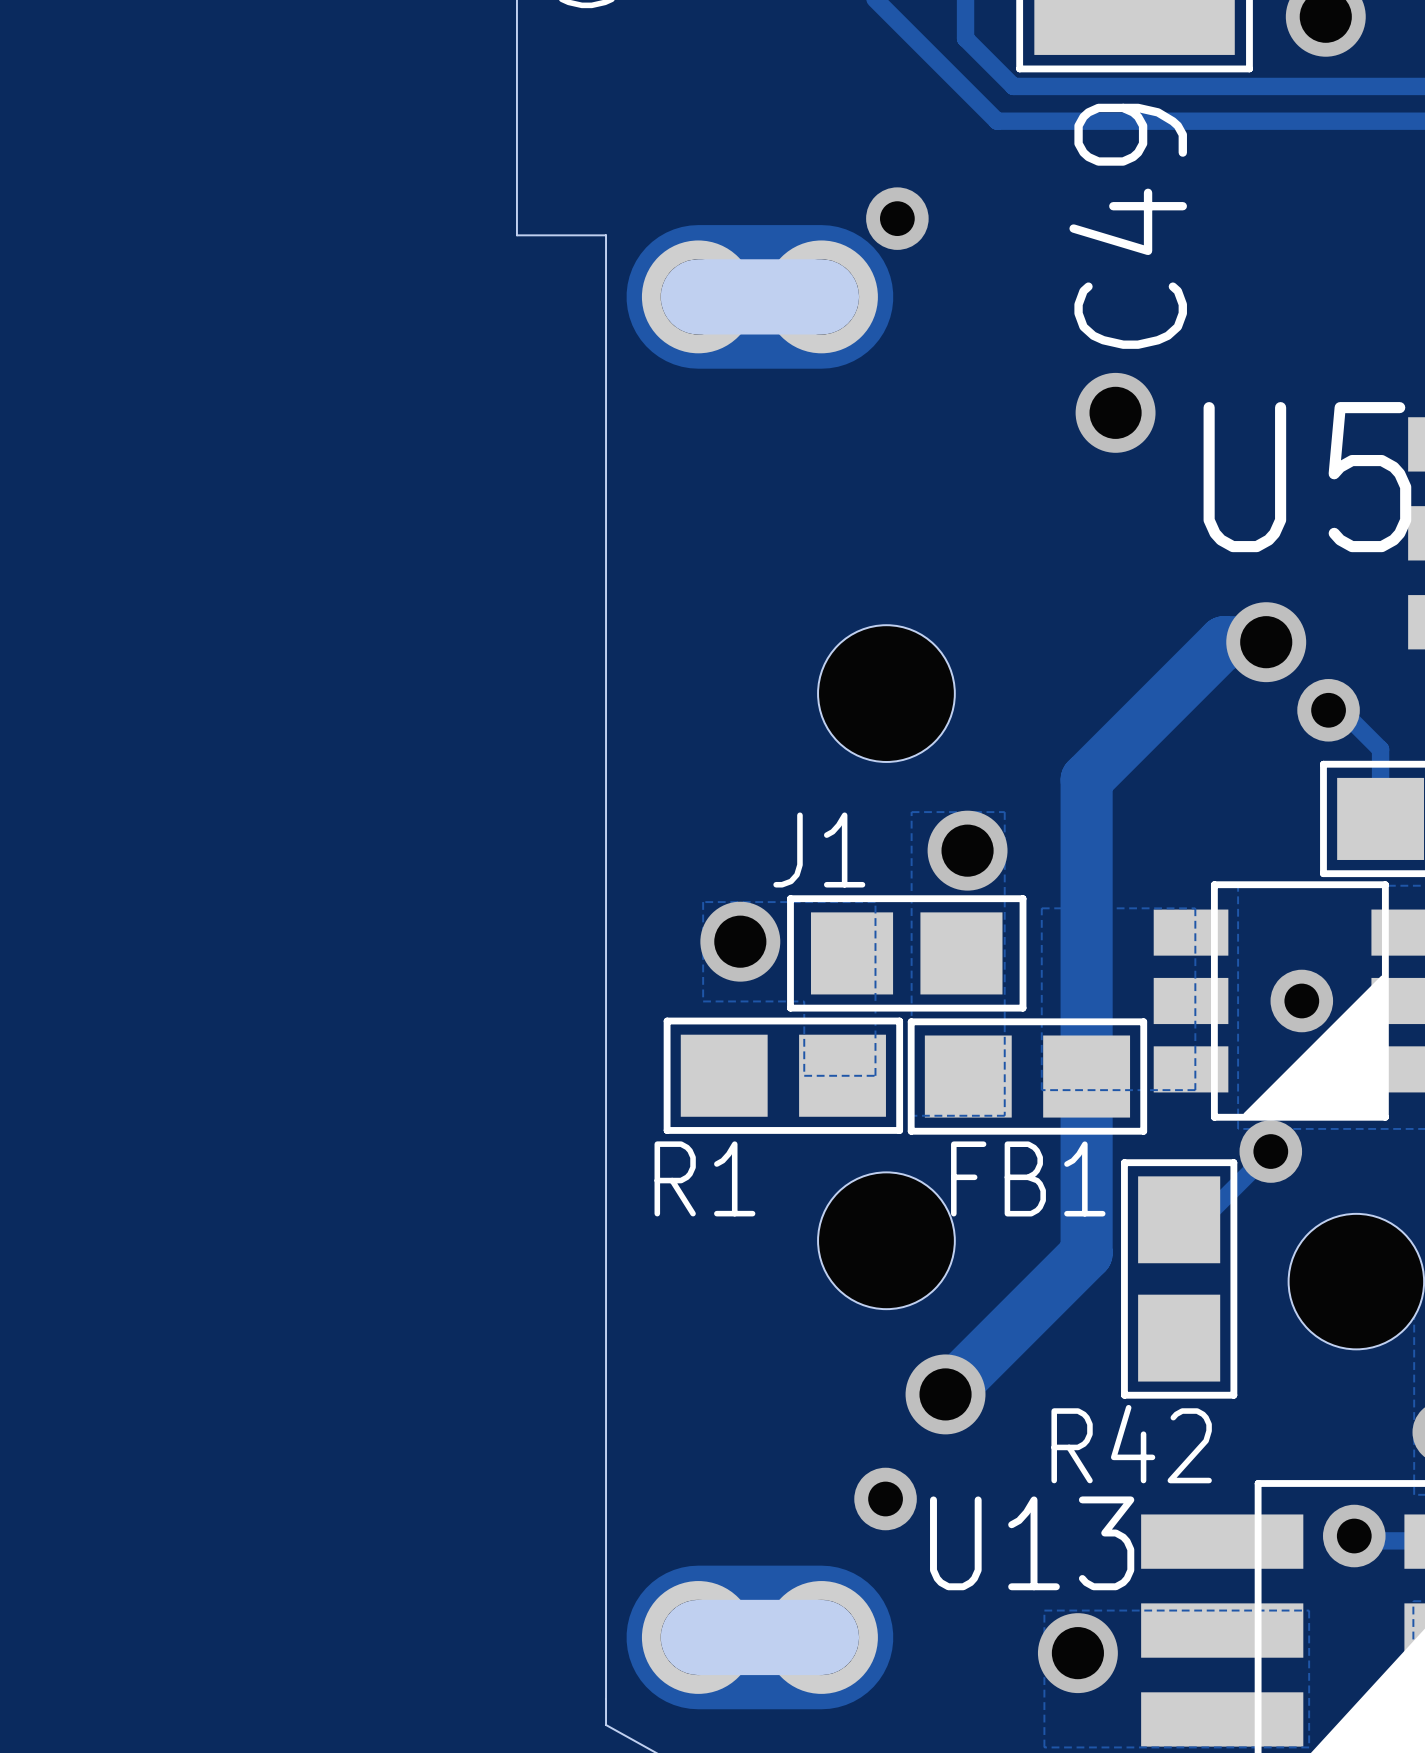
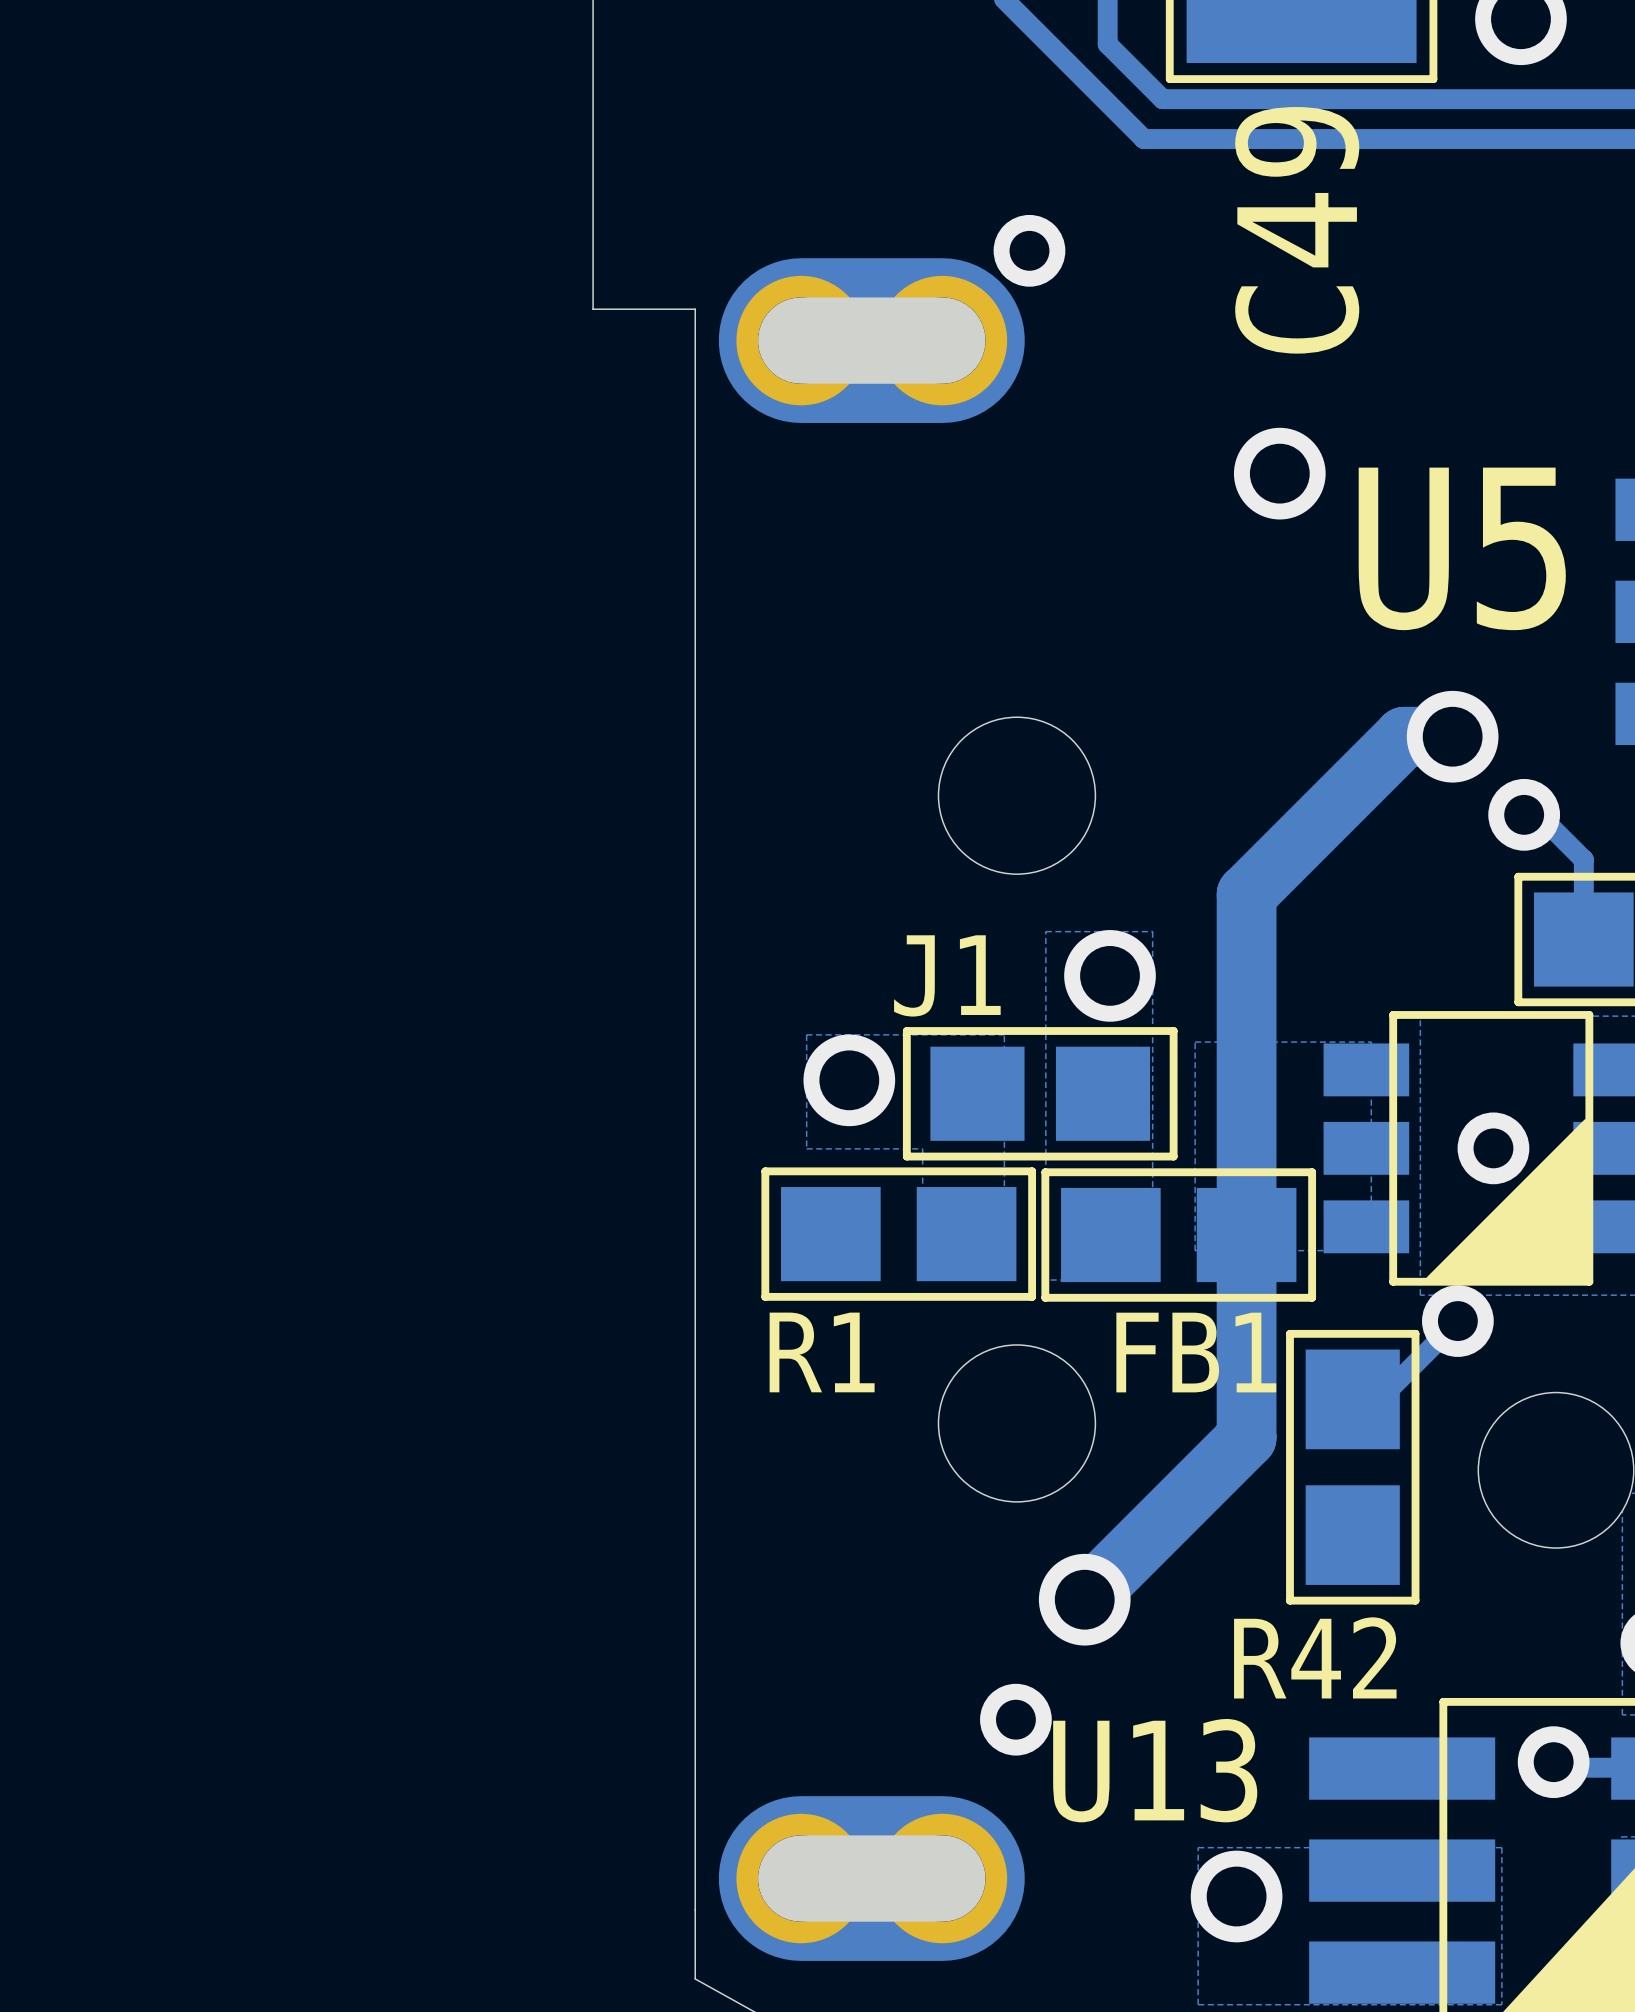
part footprint: [606, 225, 955, 1710] -> [695, 258, 1096, 1961]
board edge: (606, 235) (516, 235) -> (695, 309) (593, 309) (593, 269)

